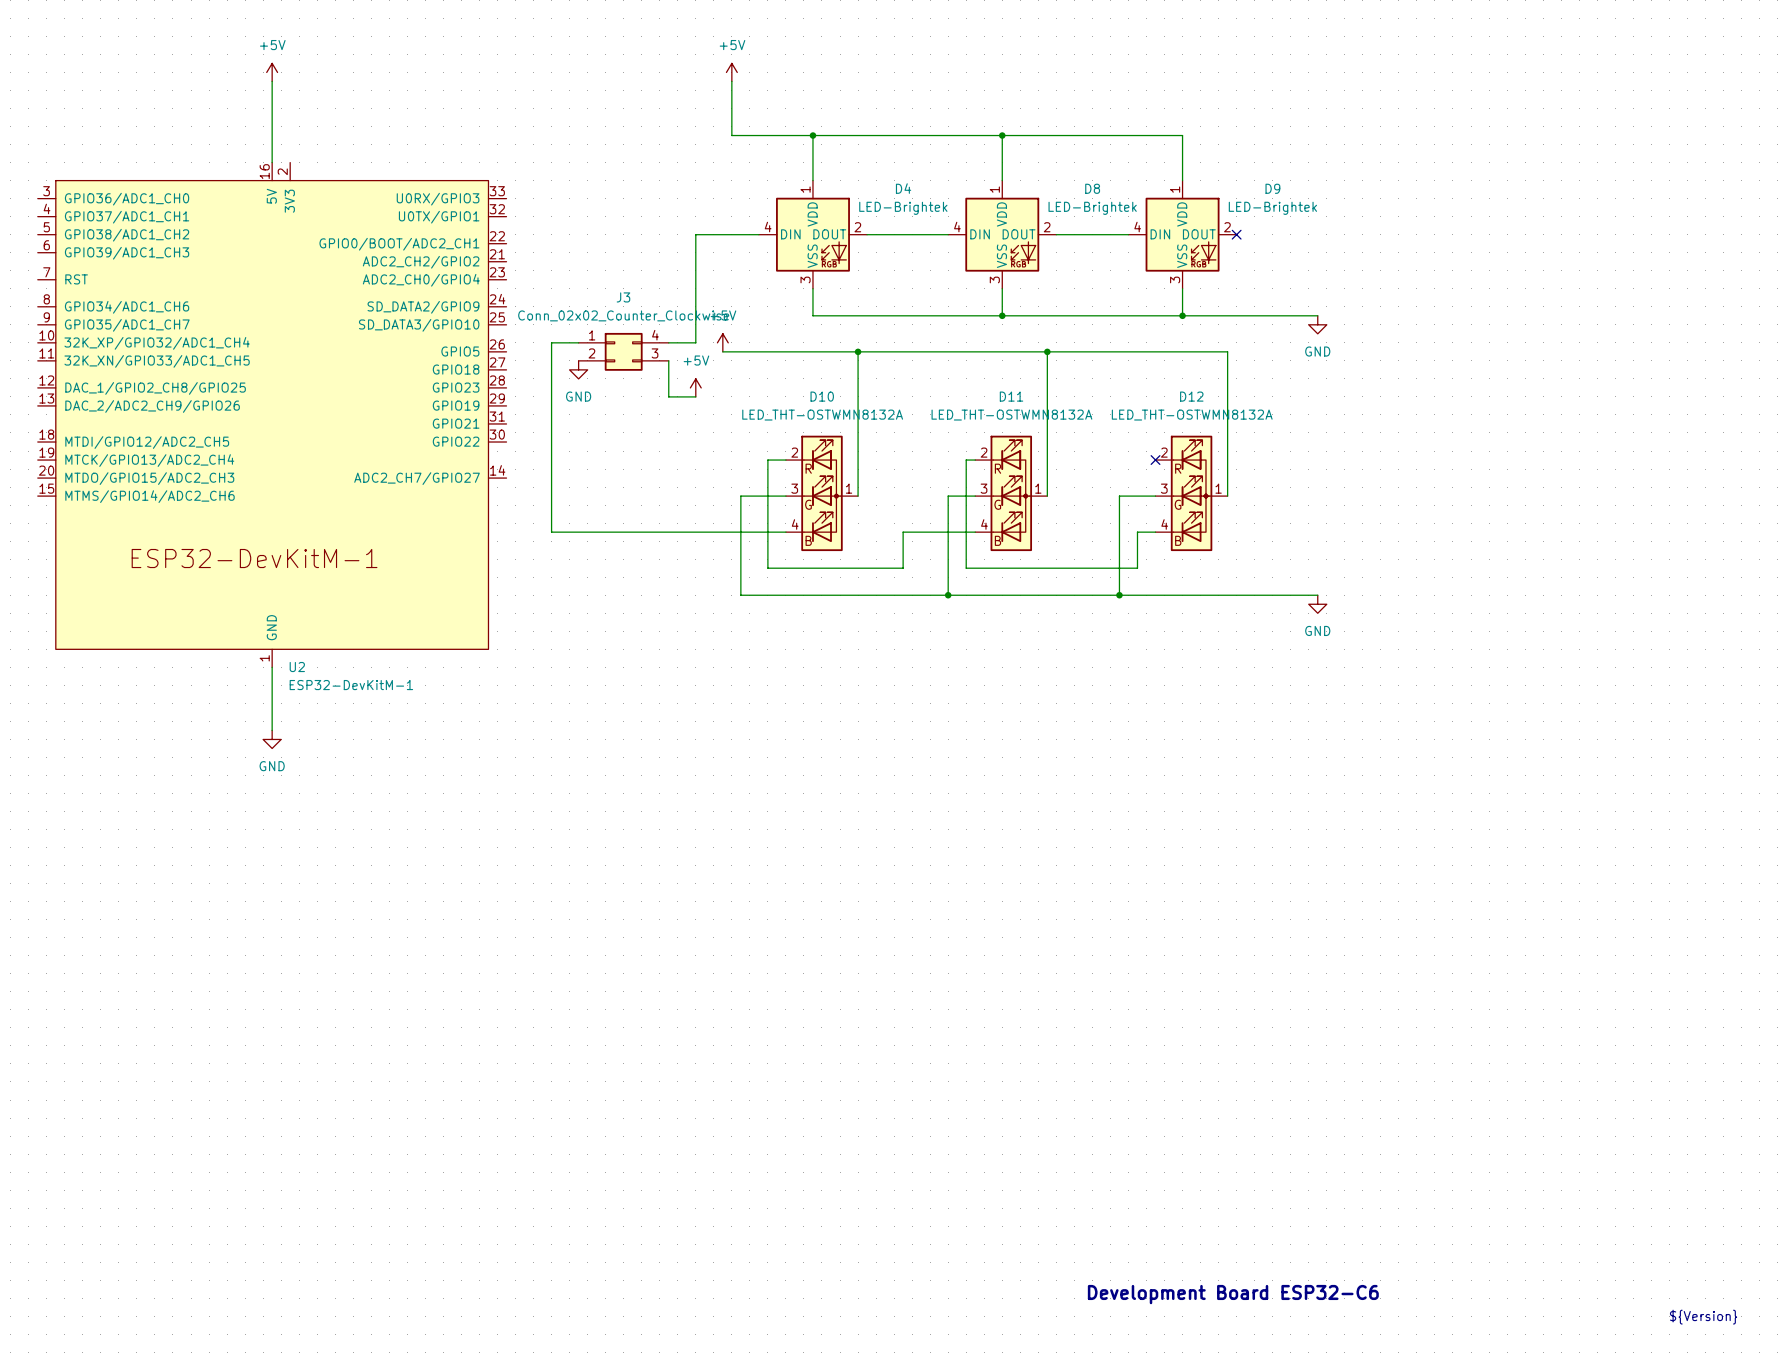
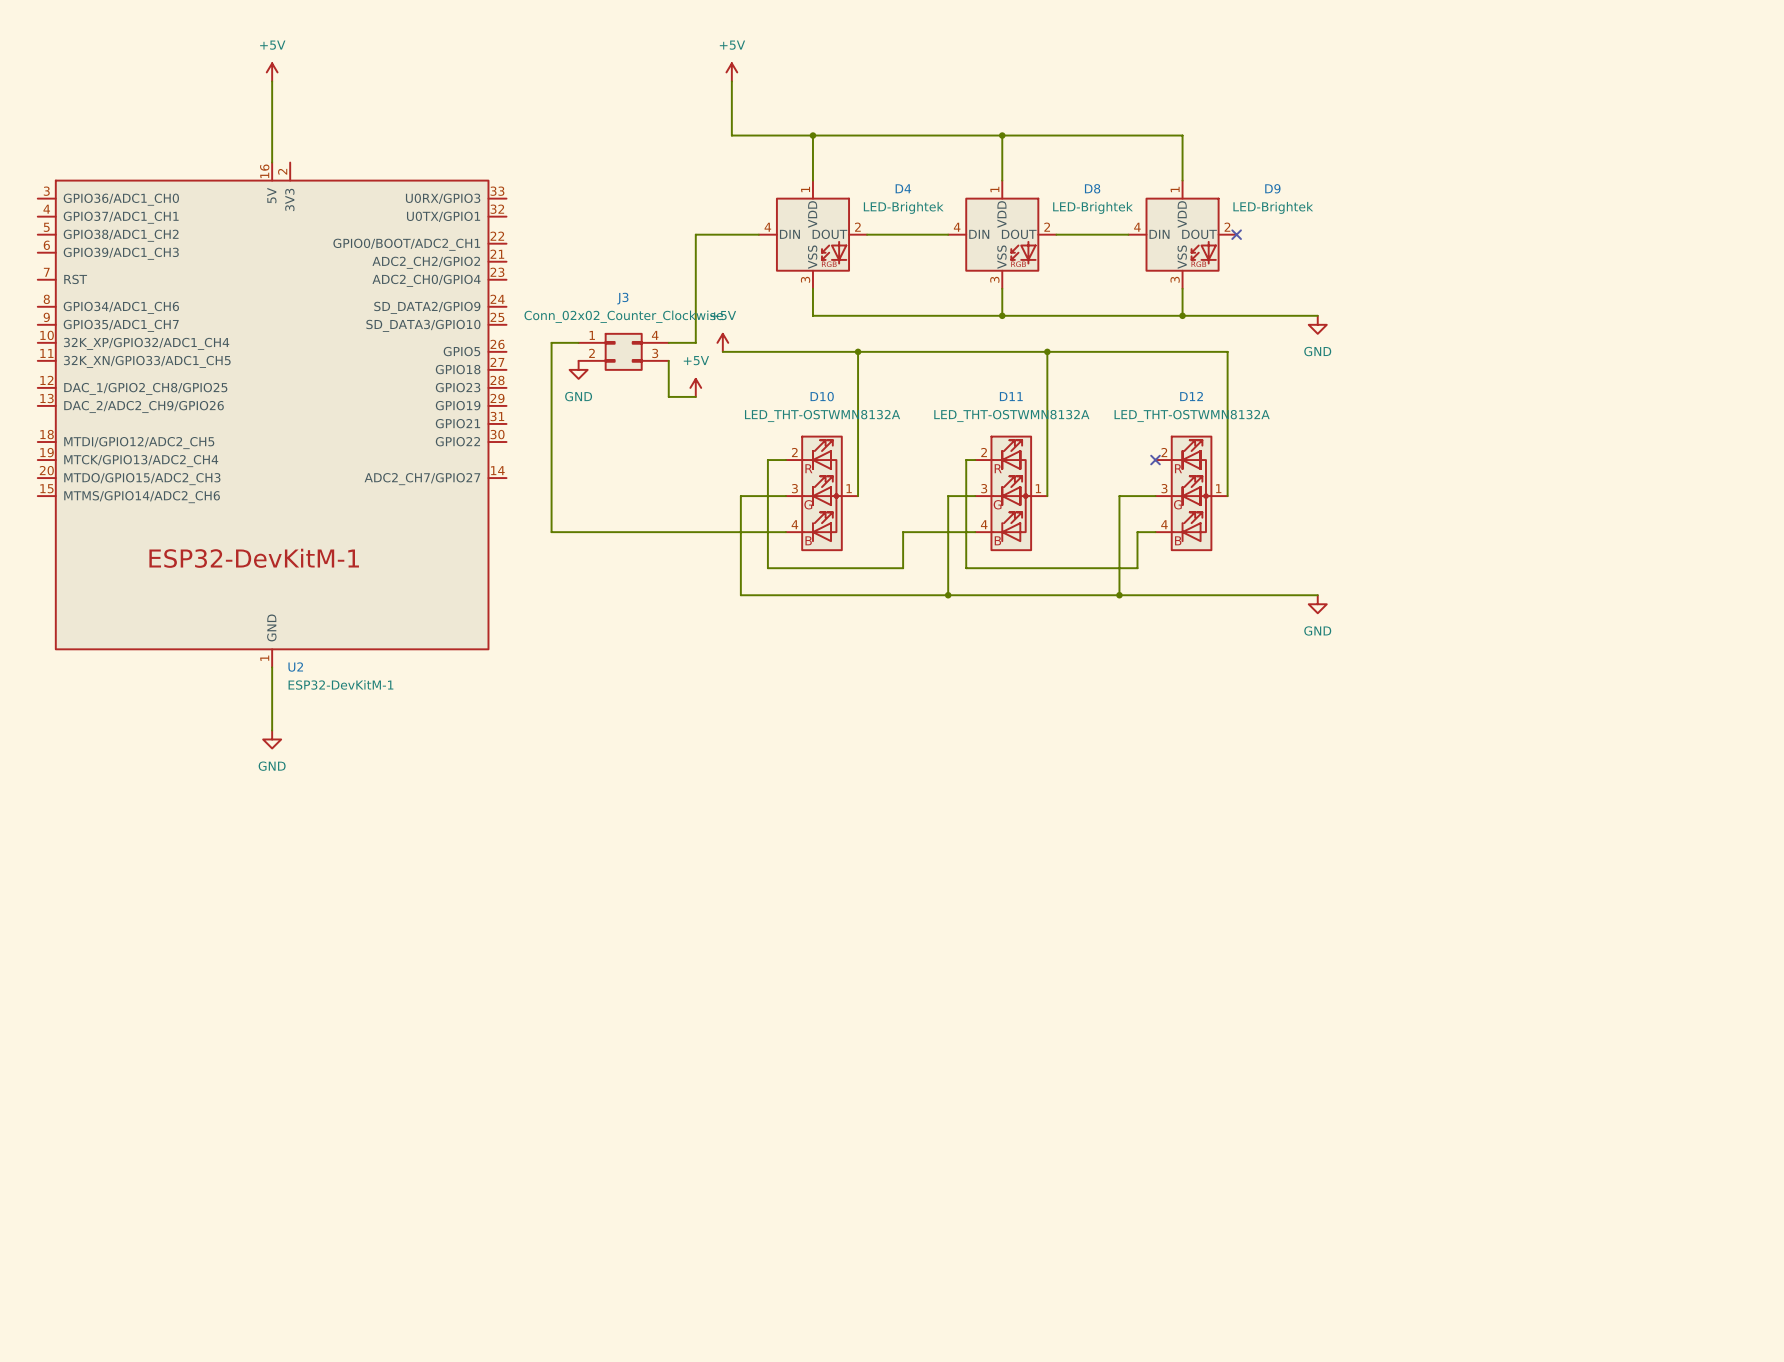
text: Development Board ESP32-C6 (1233, 1294) -> none
text: ${Version} (1703, 1317) -> none

